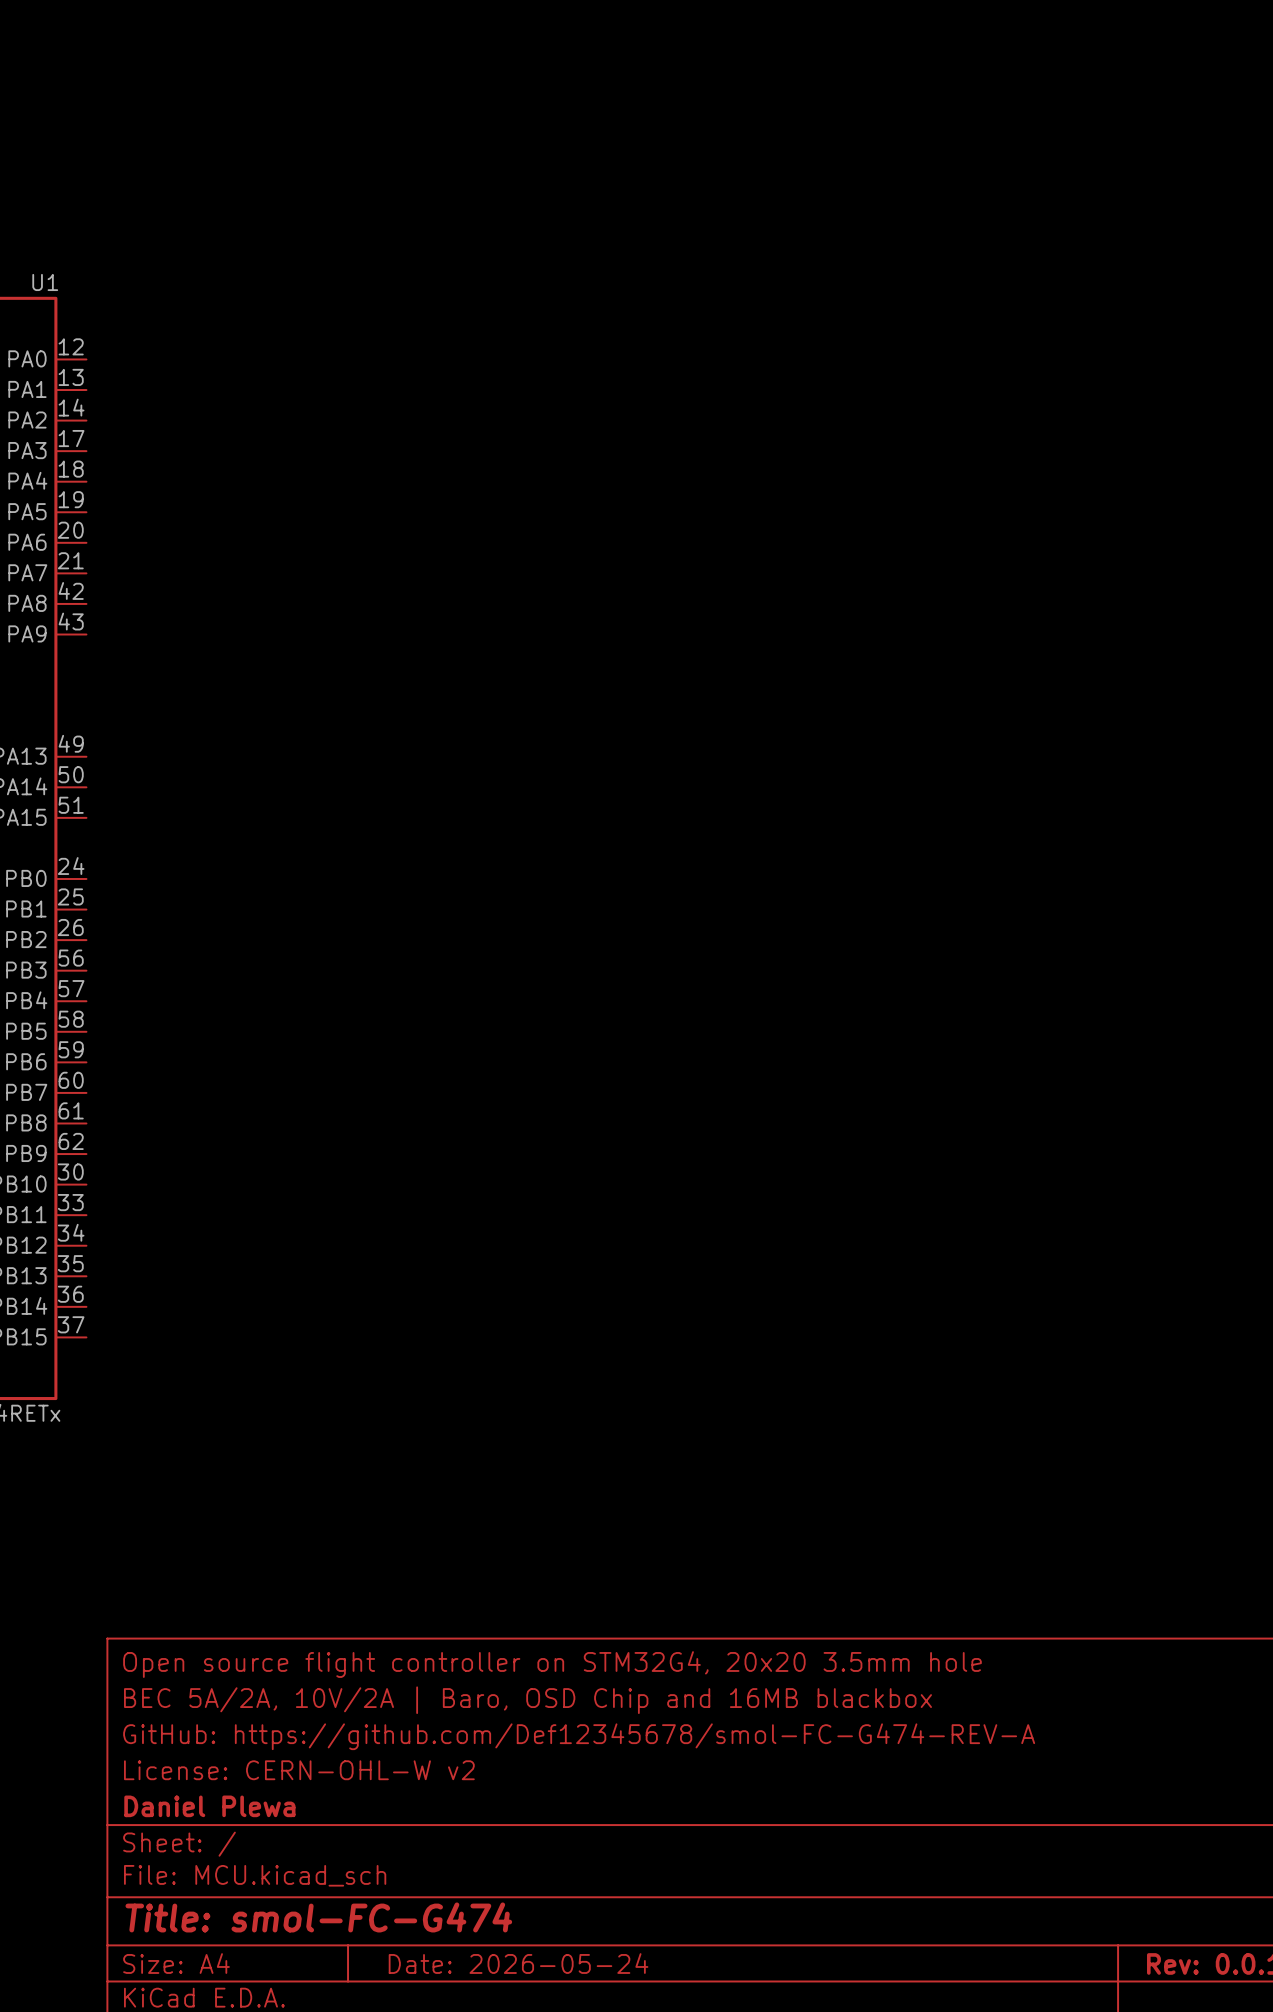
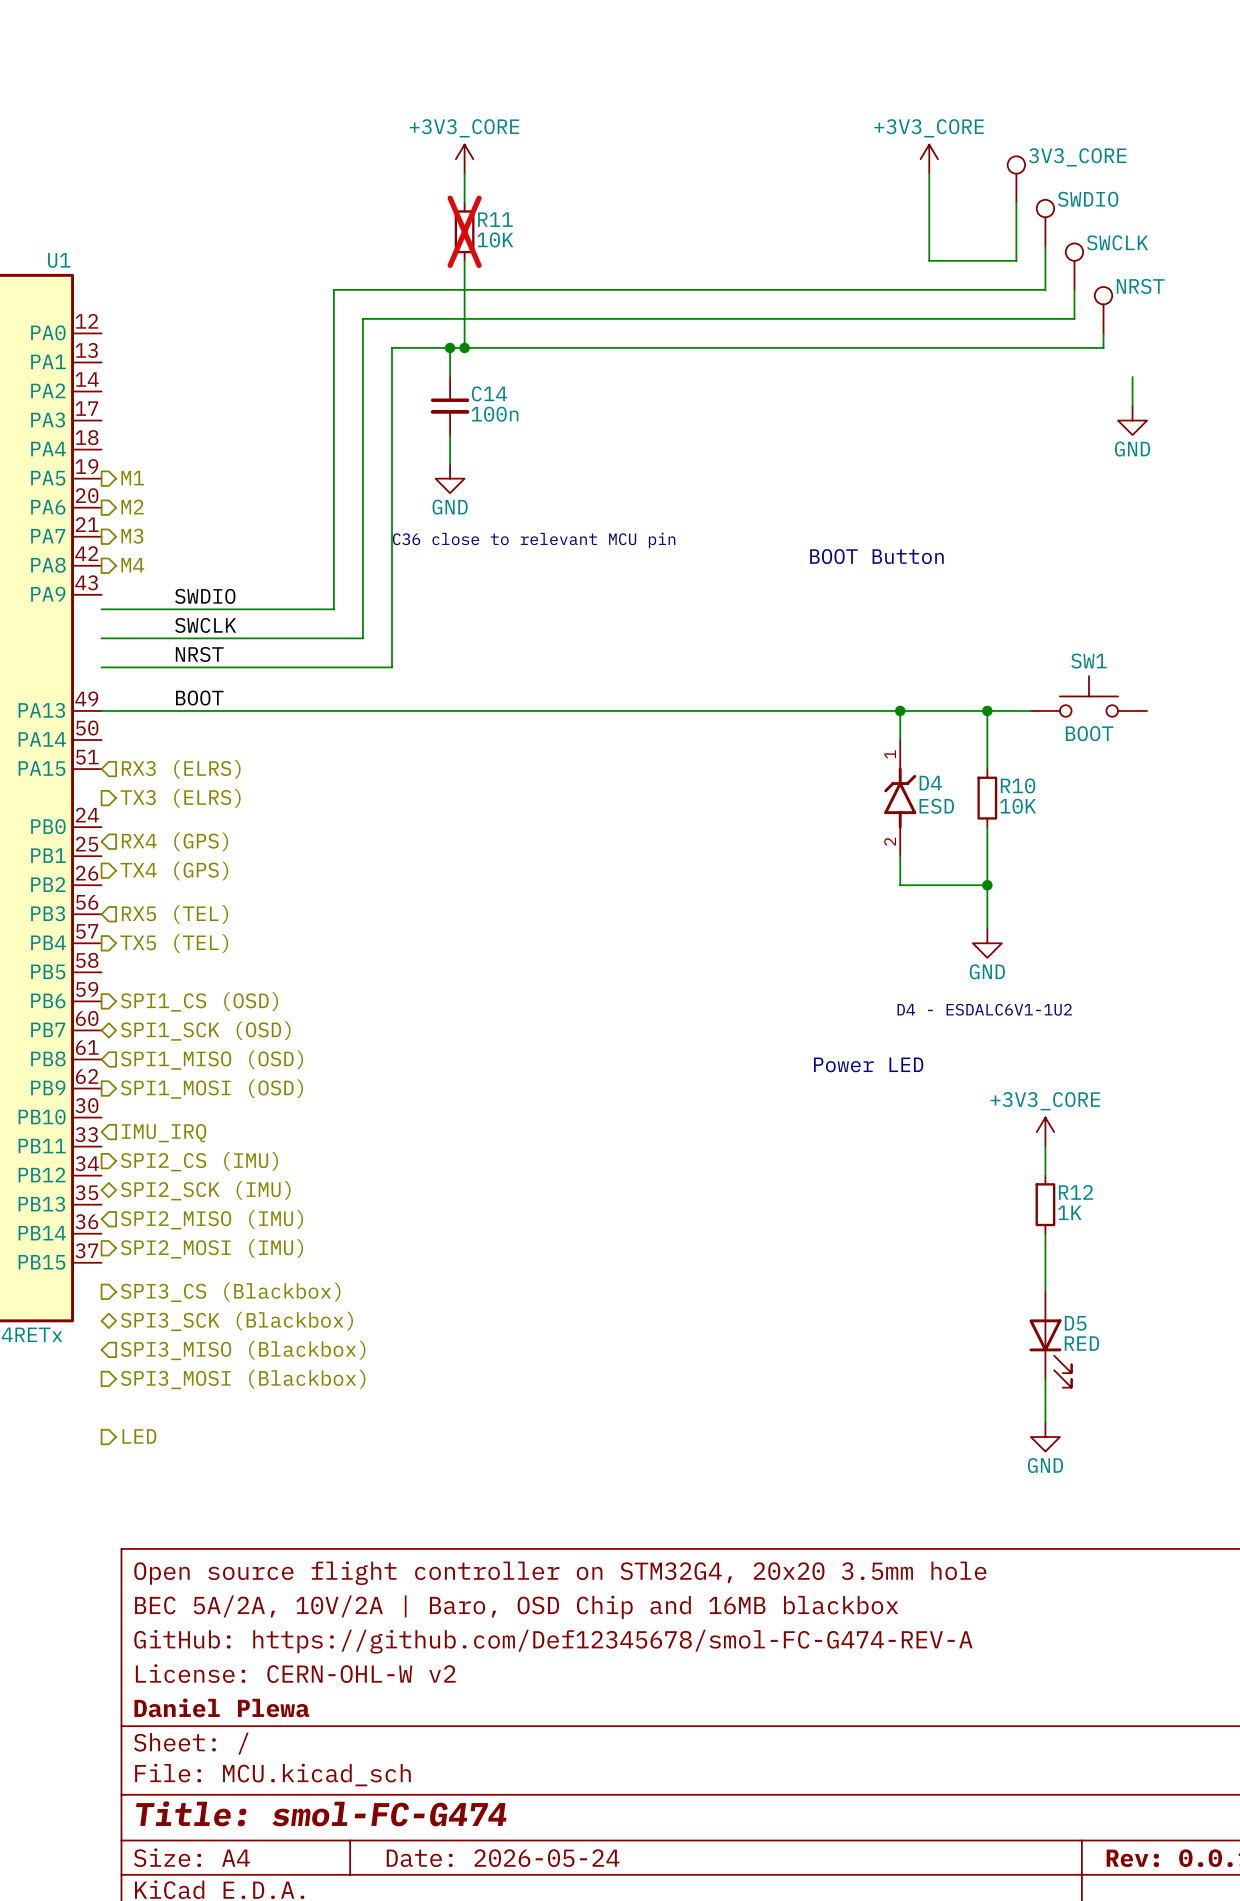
power symbol: none -> +3V3_CORE (464, 159)
power symbol: none -> +3V3_CORE (929, 159)
wire: none -> (464, 173) (464, 202)
wire: none -> (929, 173) (929, 260) (1016, 260) (1016, 202)
3V3_CORE: none -> (1016, 179)
SWDIO: none -> (1045, 223)
R11: none -> 10K (464, 231)
wire: none -> (1045, 246) (1045, 289) (333, 289) (333, 609) (101, 609)
wire: none -> (464, 260) (464, 347)
SWCLK: none -> (1074, 266)
wire: none -> (1074, 289) (1074, 318) (362, 318) (362, 638) (101, 638)
NRST: none -> (1103, 310)
wire: none -> (1103, 333) (1103, 347) (391, 347) (391, 667) (101, 667)
wire: none -> (450, 347) (450, 377)
junction: none -> (450, 347)
junction: none -> (464, 347)
wire: none -> (1132, 377) (1132, 406)
C14: none -> 100n (450, 406)
power symbol: none -> GND (1132, 420)
wire: none -> (450, 435) (450, 464)
hierarchical label: none -> M1 (132, 478)
power symbol: none -> GND (450, 478)
hierarchical label: none -> M2 (132, 507)
hierarchical label: none -> M3 (132, 536)
text: none -> C36 close to relevant MCU pin (534, 540)
text: none -> BOOT Button (876, 556)
hierarchical label: none -> M4 (132, 565)
label: none -> SWDIO (205, 596)
label: none -> SWCLK (205, 625)
label: none -> NRST (199, 654)
SW1: none -> BOOT (1089, 696)
label: none -> BOOT (199, 698)
wire: none -> (101, 710) (1030, 710)
wire: none -> (900, 710) (900, 740)
junction: none -> (900, 710)
wire: none -> (987, 710) (987, 769)
junction: none -> (987, 710)
hierarchical label: none -> RX3 (ELRS) (181, 769)
D4: none -> ESD (900, 798)
R10: none -> 10K (987, 798)
hierarchical label: none -> TX3 (ELRS) (180, 798)
wire: none -> (987, 827) (987, 928)
hierarchical label: none -> RX4 (GPS) (174, 841)
wire: none -> (900, 856) (900, 885) (987, 885)
hierarchical label: none -> TX4 (GPS) (174, 870)
junction: none -> (987, 885)
hierarchical label: none -> RX5 (TEL) (174, 914)
power symbol: none -> GND (987, 943)
hierarchical label: none -> TX5 (TEL) (174, 943)
hierarchical label: none -> SPI1_CS (OSD) (199, 1001)
text: none -> D4 - ESDALC6V1-1U2 (984, 1009)
hierarchical label: none -> SPI1_SCK (OSD) (205, 1031)
hierarchical label: none -> SPI1_MISO (OSD) (211, 1060)
text: none -> Power LED (868, 1064)
hierarchical label: none -> SPI1_MOSI (OSD) (211, 1089)
power symbol: none -> +3V3_CORE (1045, 1132)
hierarchical label: none -> IMU_IRQ (164, 1133)
wire: none -> (1045, 1146) (1045, 1175)
hierarchical label: none -> SPI2_CS (IMU) (199, 1161)
hierarchical label: none -> SPI2_SCK (IMU) (205, 1190)
R12: none -> 1K (1045, 1204)
hierarchical label: none -> SPI2_MISO (IMU) (211, 1219)
wire: none -> (1045, 1233) (1045, 1291)
hierarchical label: none -> SPI2_MOSI (IMU) (211, 1248)
hierarchical label: none -> SPI3_CS (Blackbox) (230, 1292)
hierarchical label: none -> SPI3_SCK (Blackbox) (236, 1321)
D5: none -> RED (1050, 1339)
hierarchical label: none -> SPI3_MISO (Blackbox) (243, 1350)
wire: none -> (1045, 1378) (1045, 1422)
hierarchical label: none -> SPI3_MOSI (Blackbox) (243, 1379)
hierarchical label: none -> LED (139, 1436)
power symbol: none -> GND (1045, 1437)

